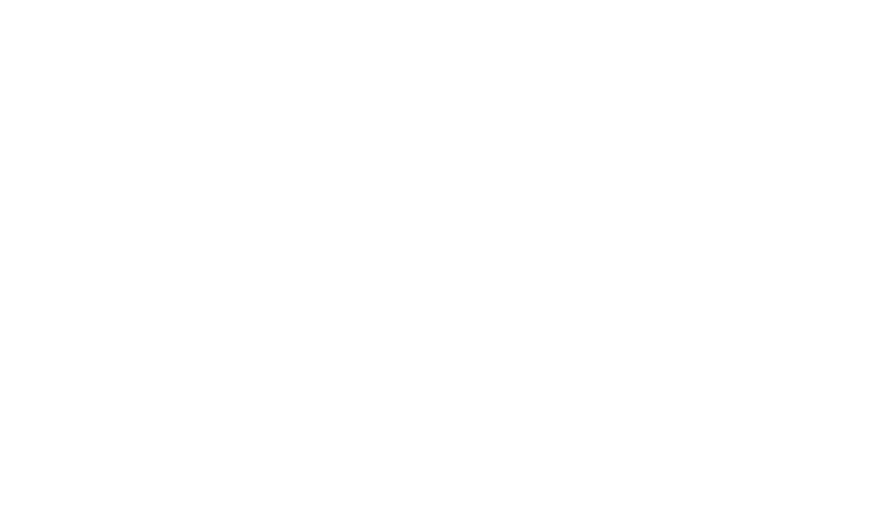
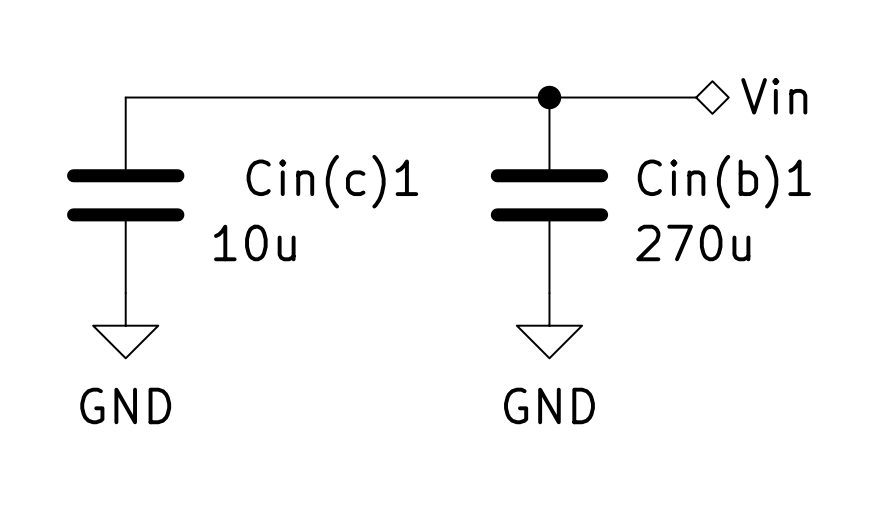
hierarchical label: none -> Vin (774, 96)
wire: none -> (125, 97) (696, 97)
junction: none -> (549, 97)
Cin(c)1: none -> 10u (125, 195)
Cin(b)1: none -> 270u (549, 195)
power symbol: none -> GND (125, 325)
power symbol: none -> GND (549, 325)

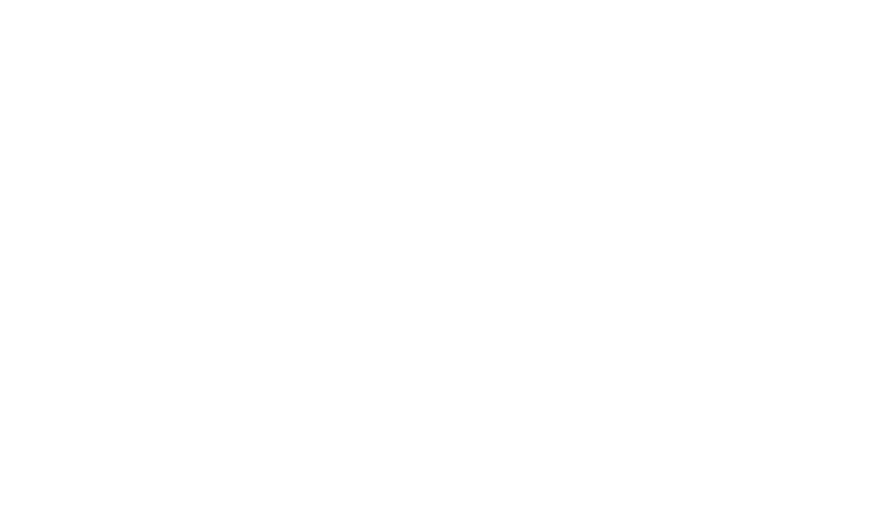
hierarchical label: Vin (774, 96) -> none
wire: (125, 97) (696, 97) -> none
junction: (549, 97) -> none
Cin(c)1: 10u (125, 195) -> none
Cin(b)1: 270u (549, 195) -> none
power symbol: GND (125, 325) -> none
power symbol: GND (549, 325) -> none

